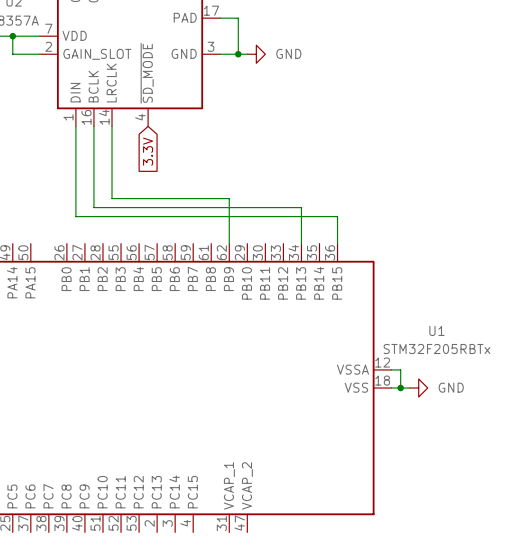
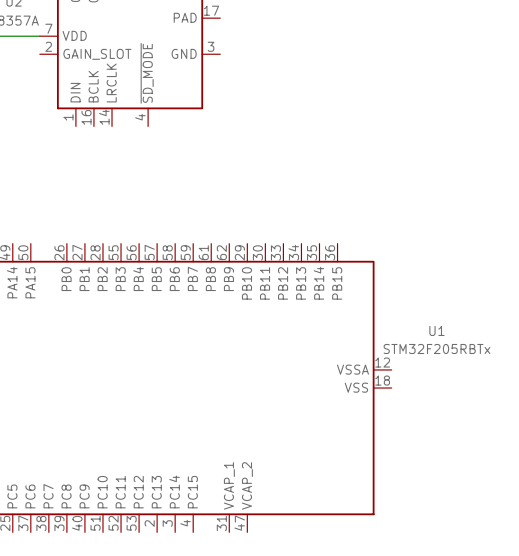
wire: (220, 18) (238, 18) (238, 54) -> none
wire: (12, 36) (12, 54) (39, 54) -> none
junction: (12, 36) -> none
wire: (220, 54) (247, 54) -> none
junction: (238, 54) -> none
power symbol: GND (256, 54) -> none
wire: (75, 126) (75, 216) (337, 216) (337, 243) -> none
wire: (93, 126) (93, 207) (301, 207) (301, 243) -> none
wire: (112, 126) (112, 198) (229, 198) (229, 243) -> none
global label: 3.3V (148, 151) -> none
wire: (391, 369) (400, 369) (400, 388) -> none
wire: (391, 388) (409, 388) -> none
junction: (400, 388) -> none
power symbol: GND (418, 388) -> none

